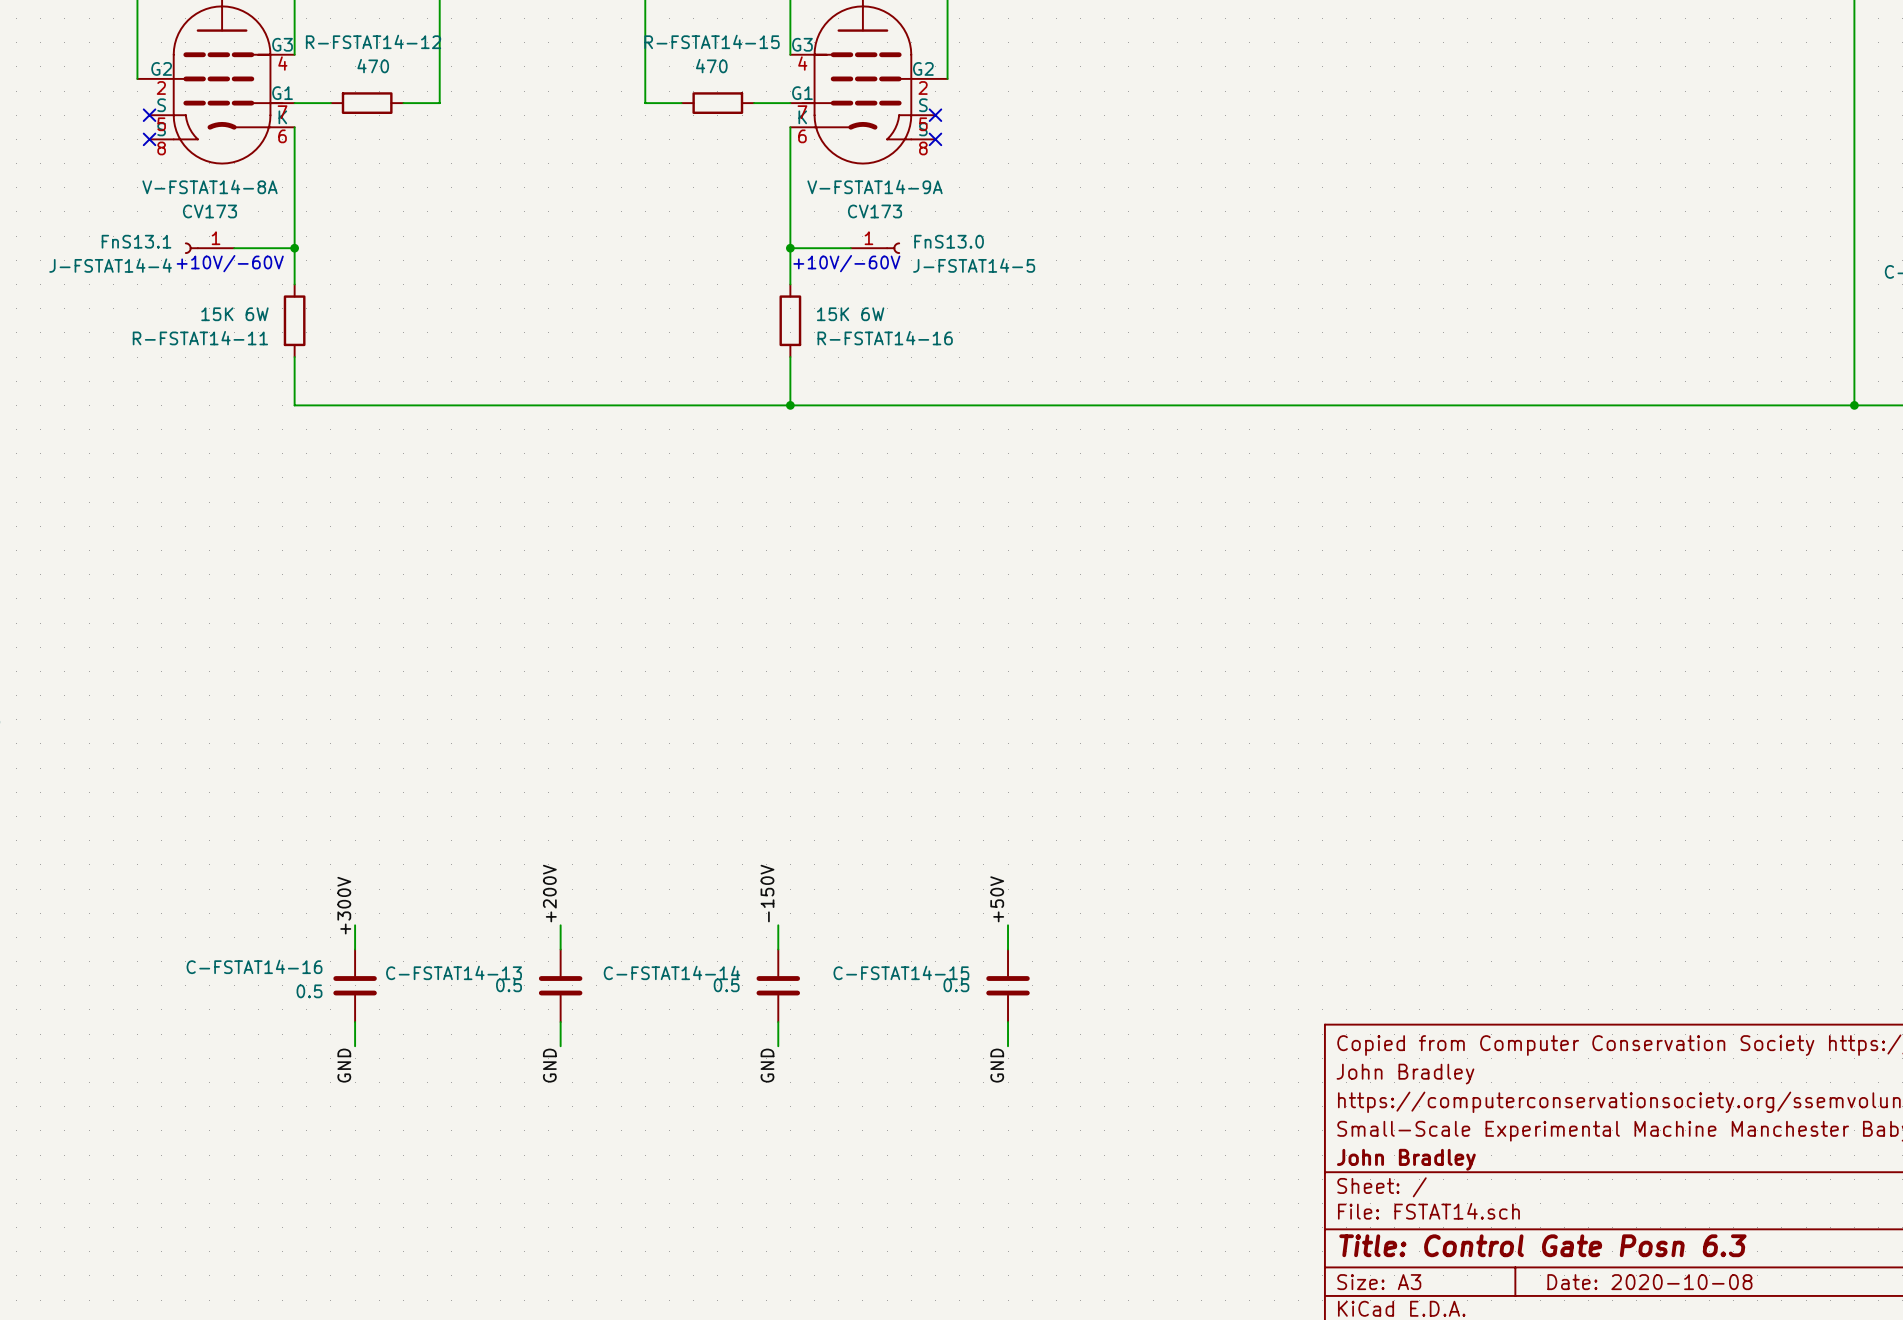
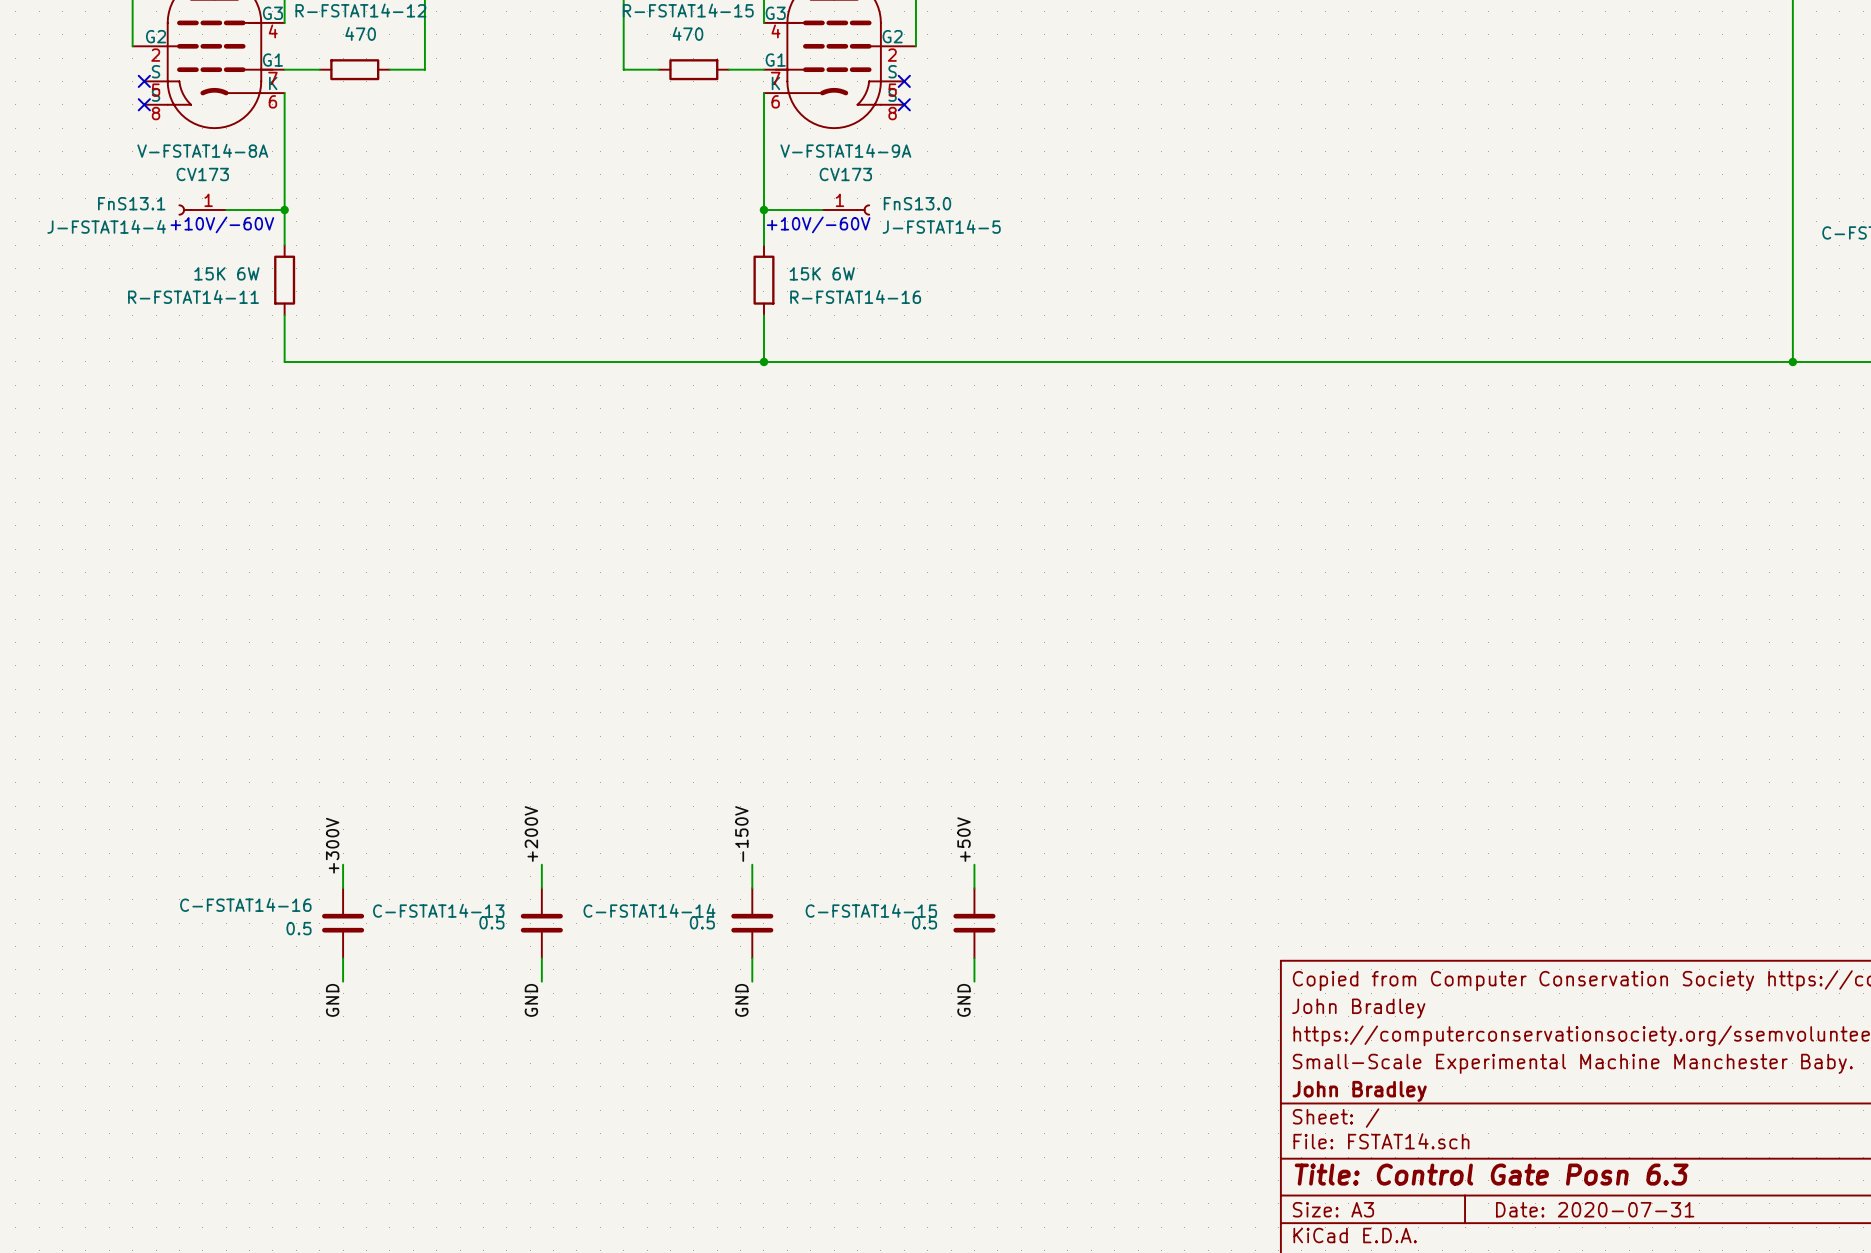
title block: Date: 2020-10-08 (1649, 1282) -> Date: 2020-07-31 (1595, 1209)

